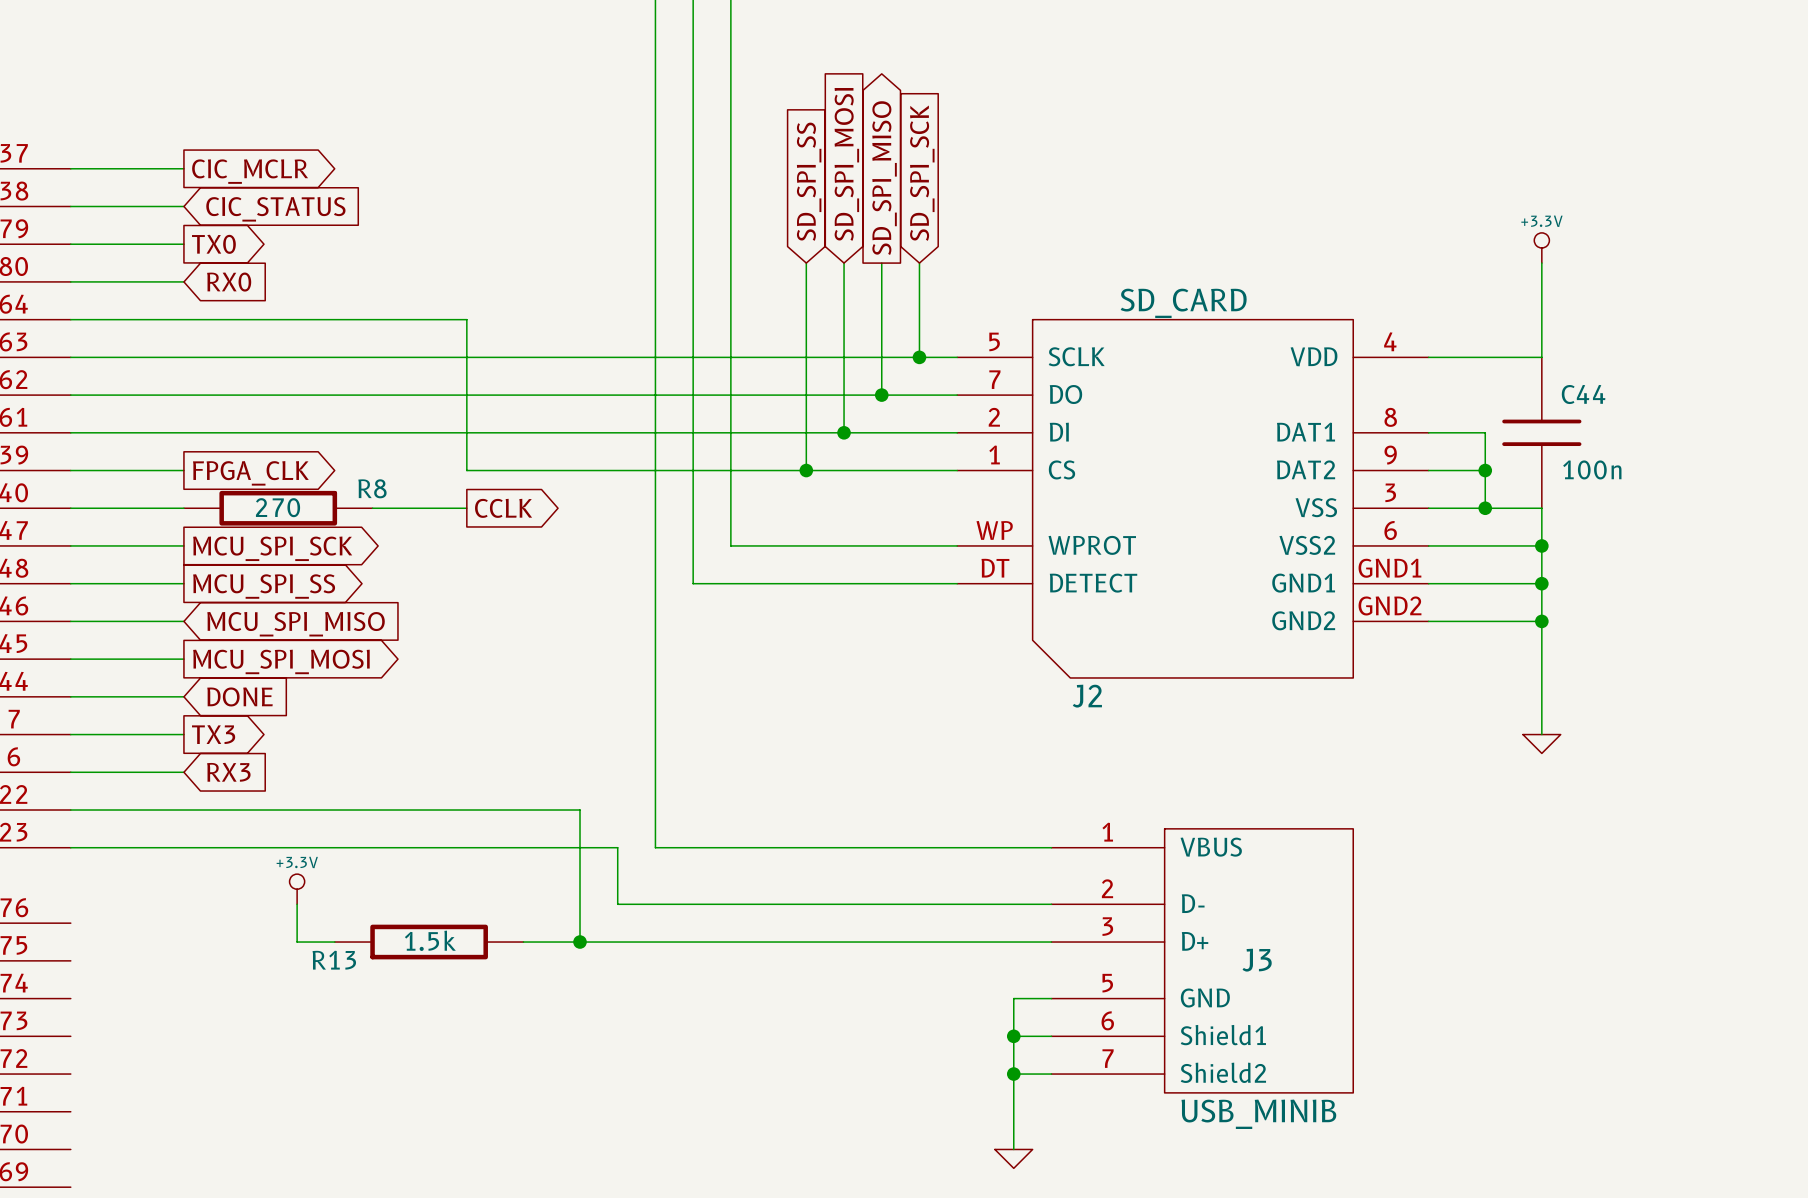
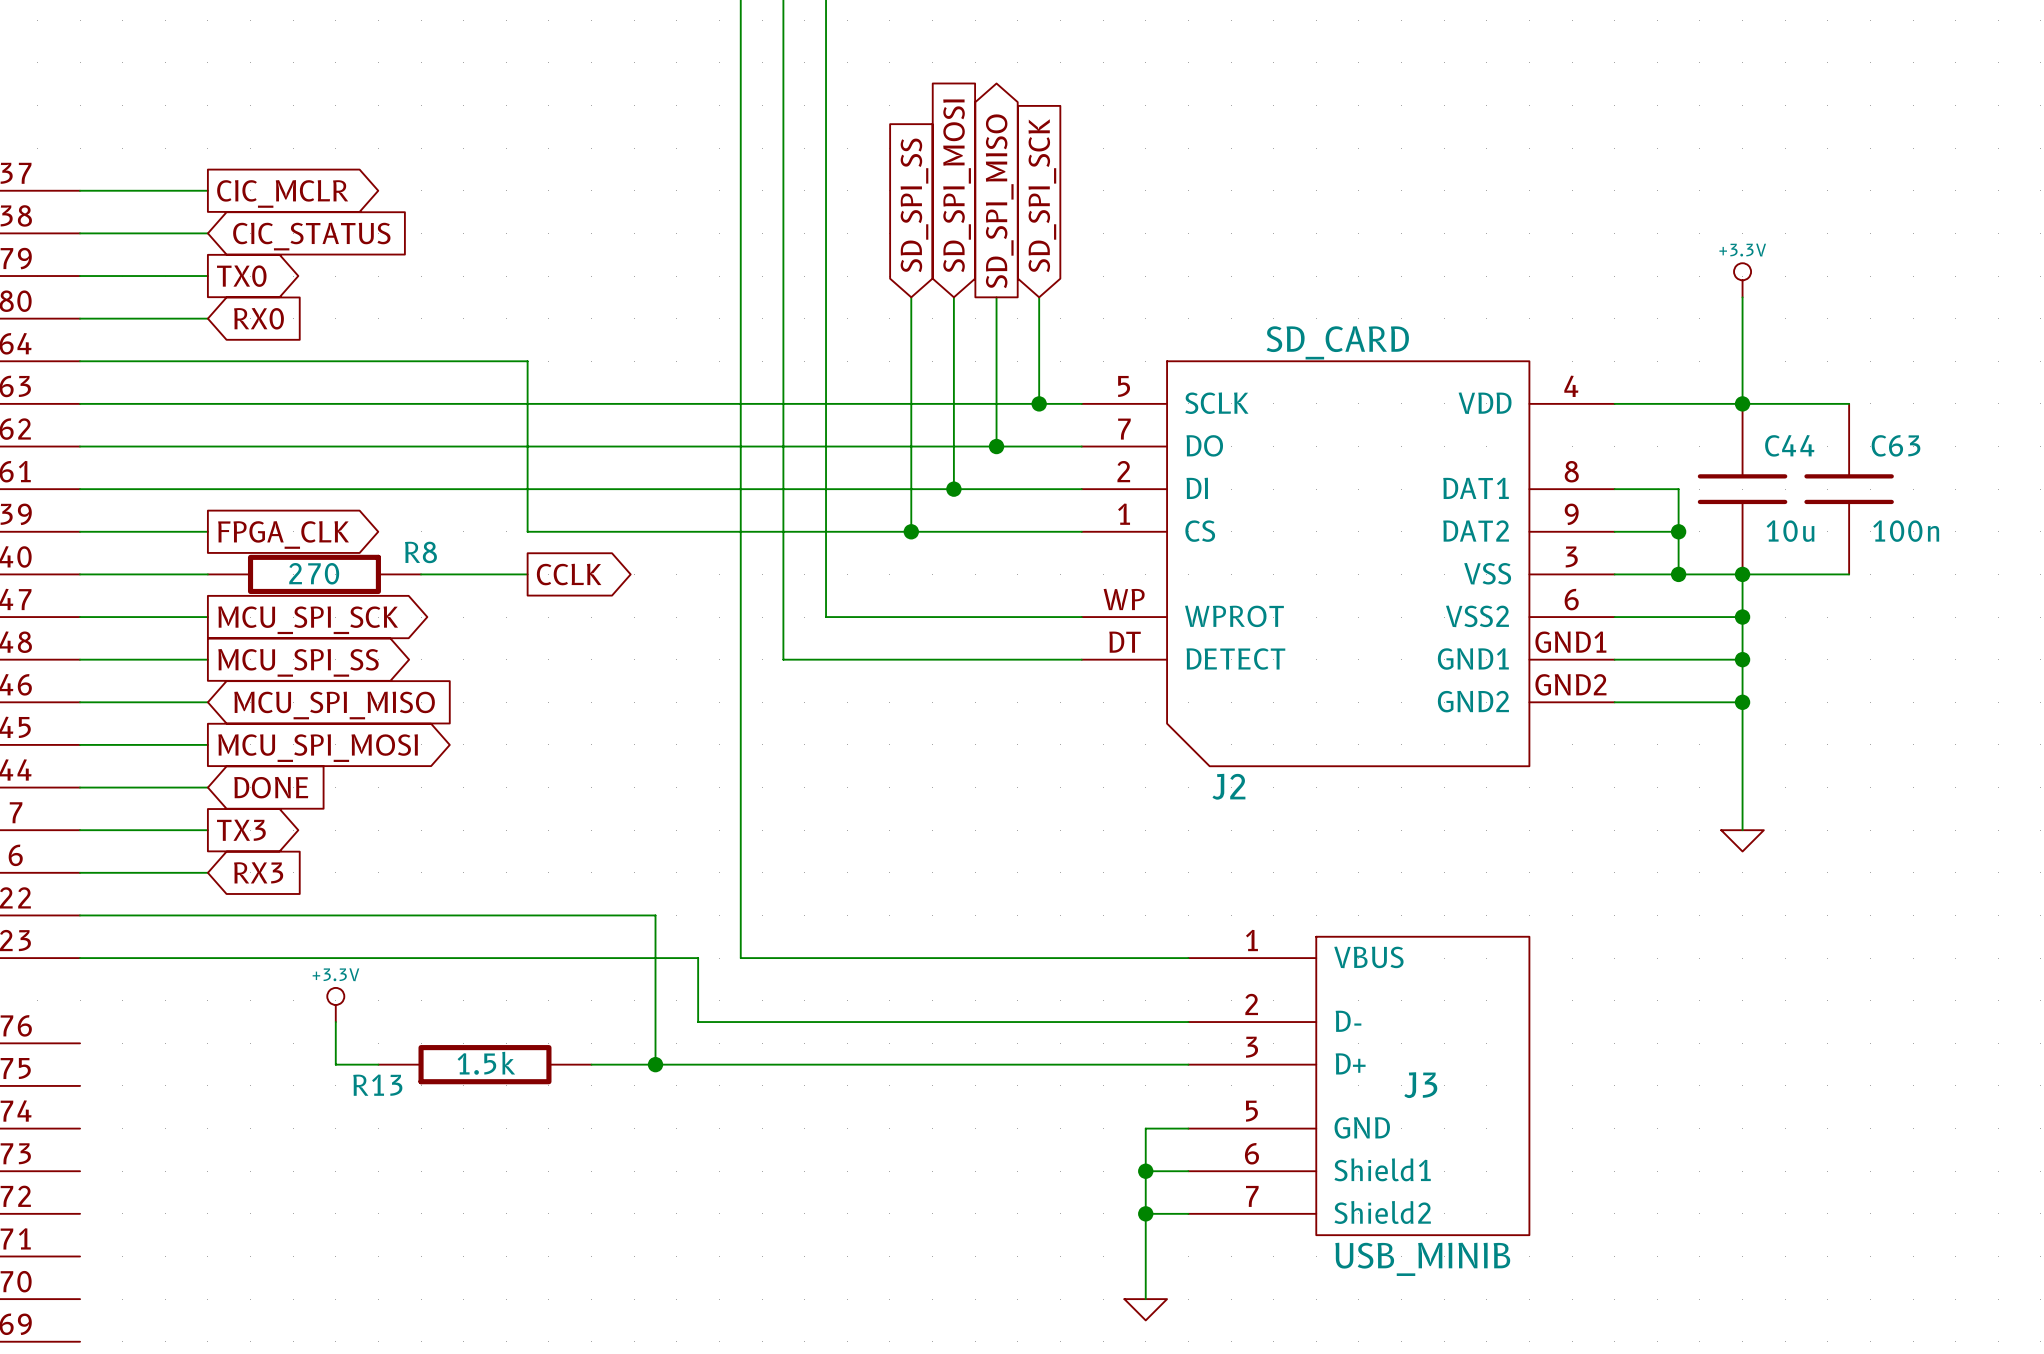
wire: none -> (1742, 403) (1849, 403)
junction: none -> (1742, 403)
C63: none -> 100n (1849, 489)
C44 value: 100n (1592, 469) -> 10u (1790, 531)
wire: none -> (1742, 574) (1849, 574)
junction: none -> (1742, 574)

